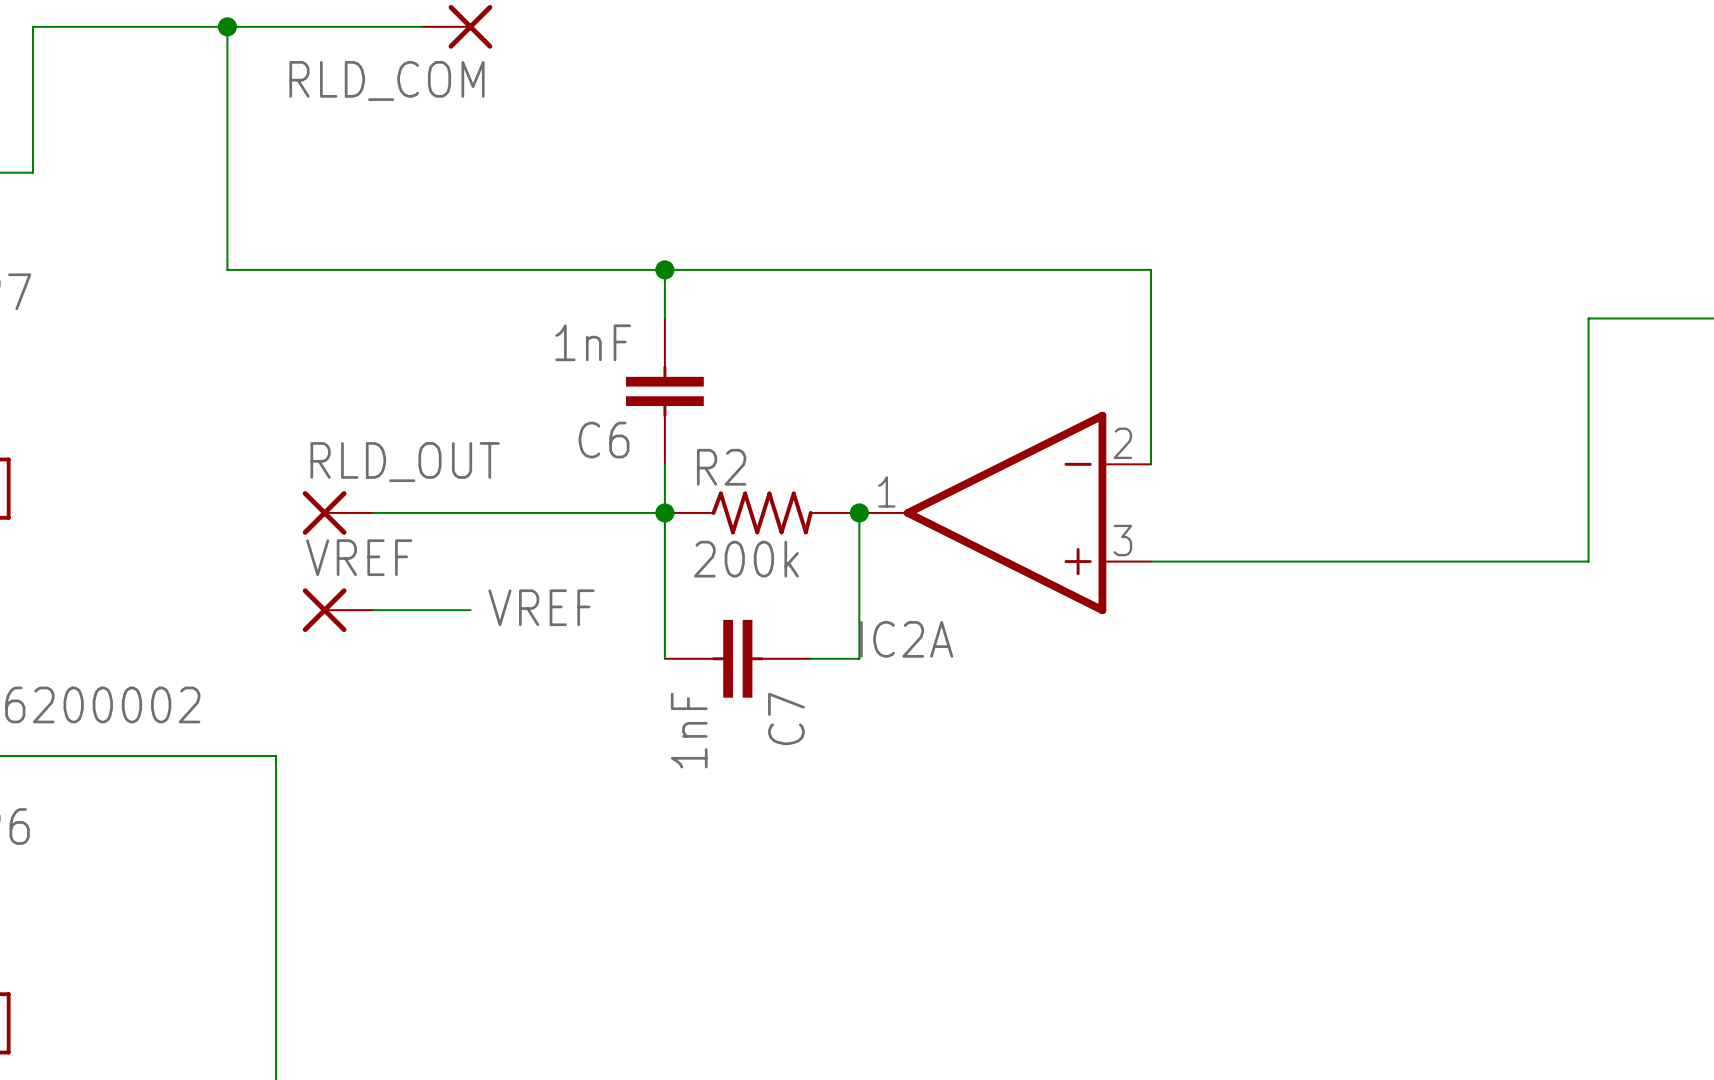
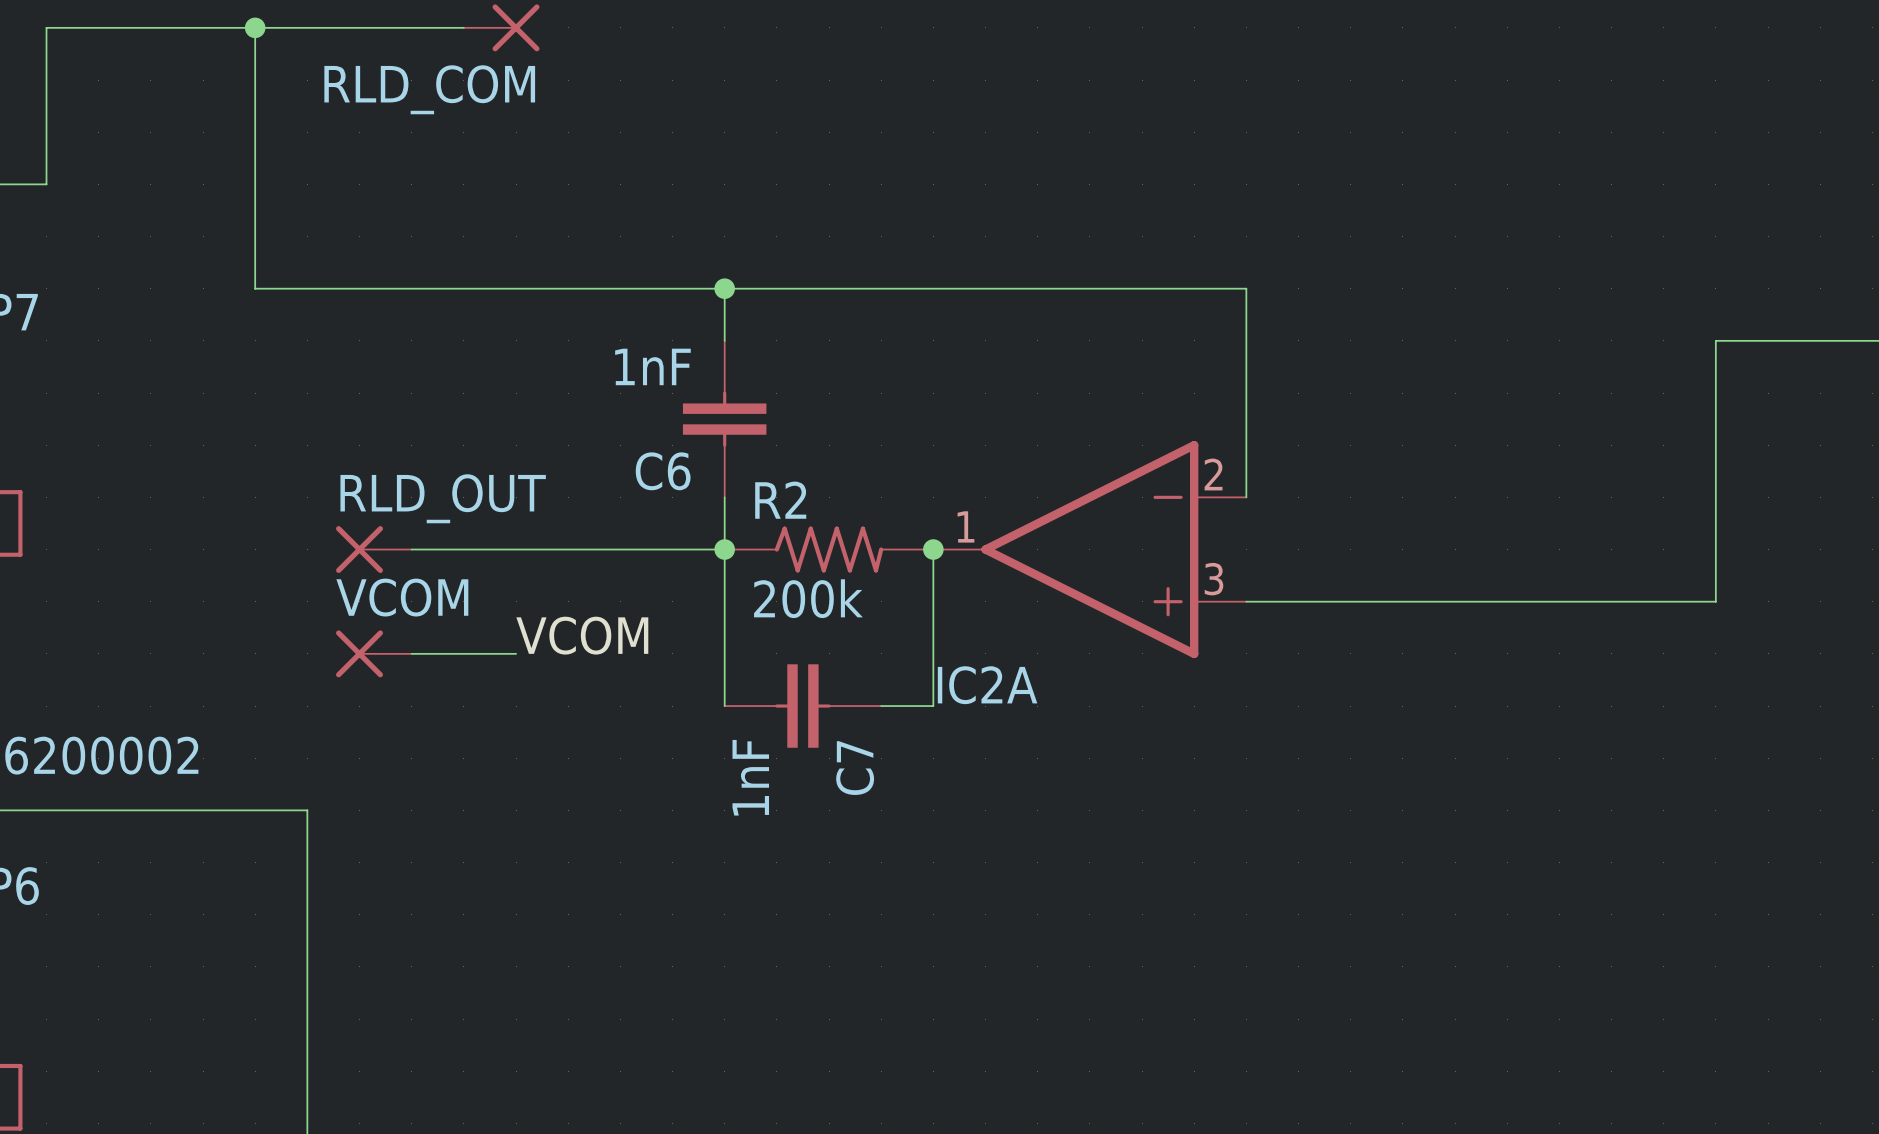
VREF name: VREF (359, 557) -> VCOM (402, 597)
label: none -> VCOM (582, 635)
text: VREF (541, 607) -> none

